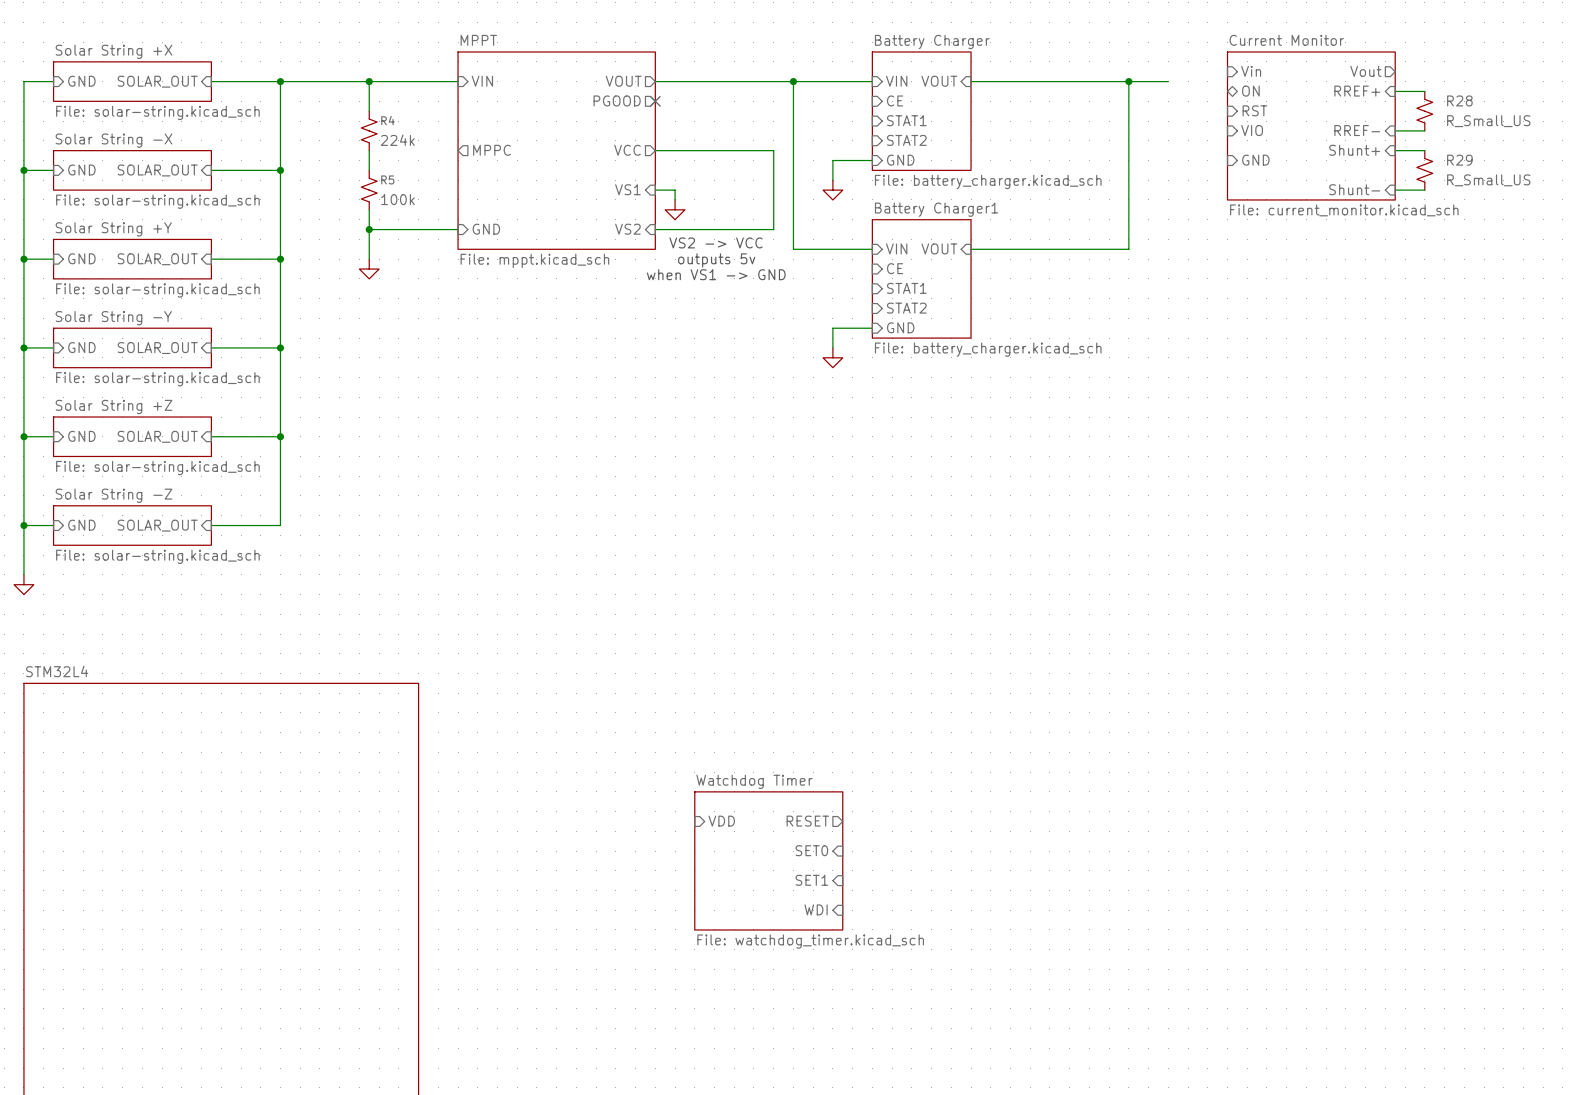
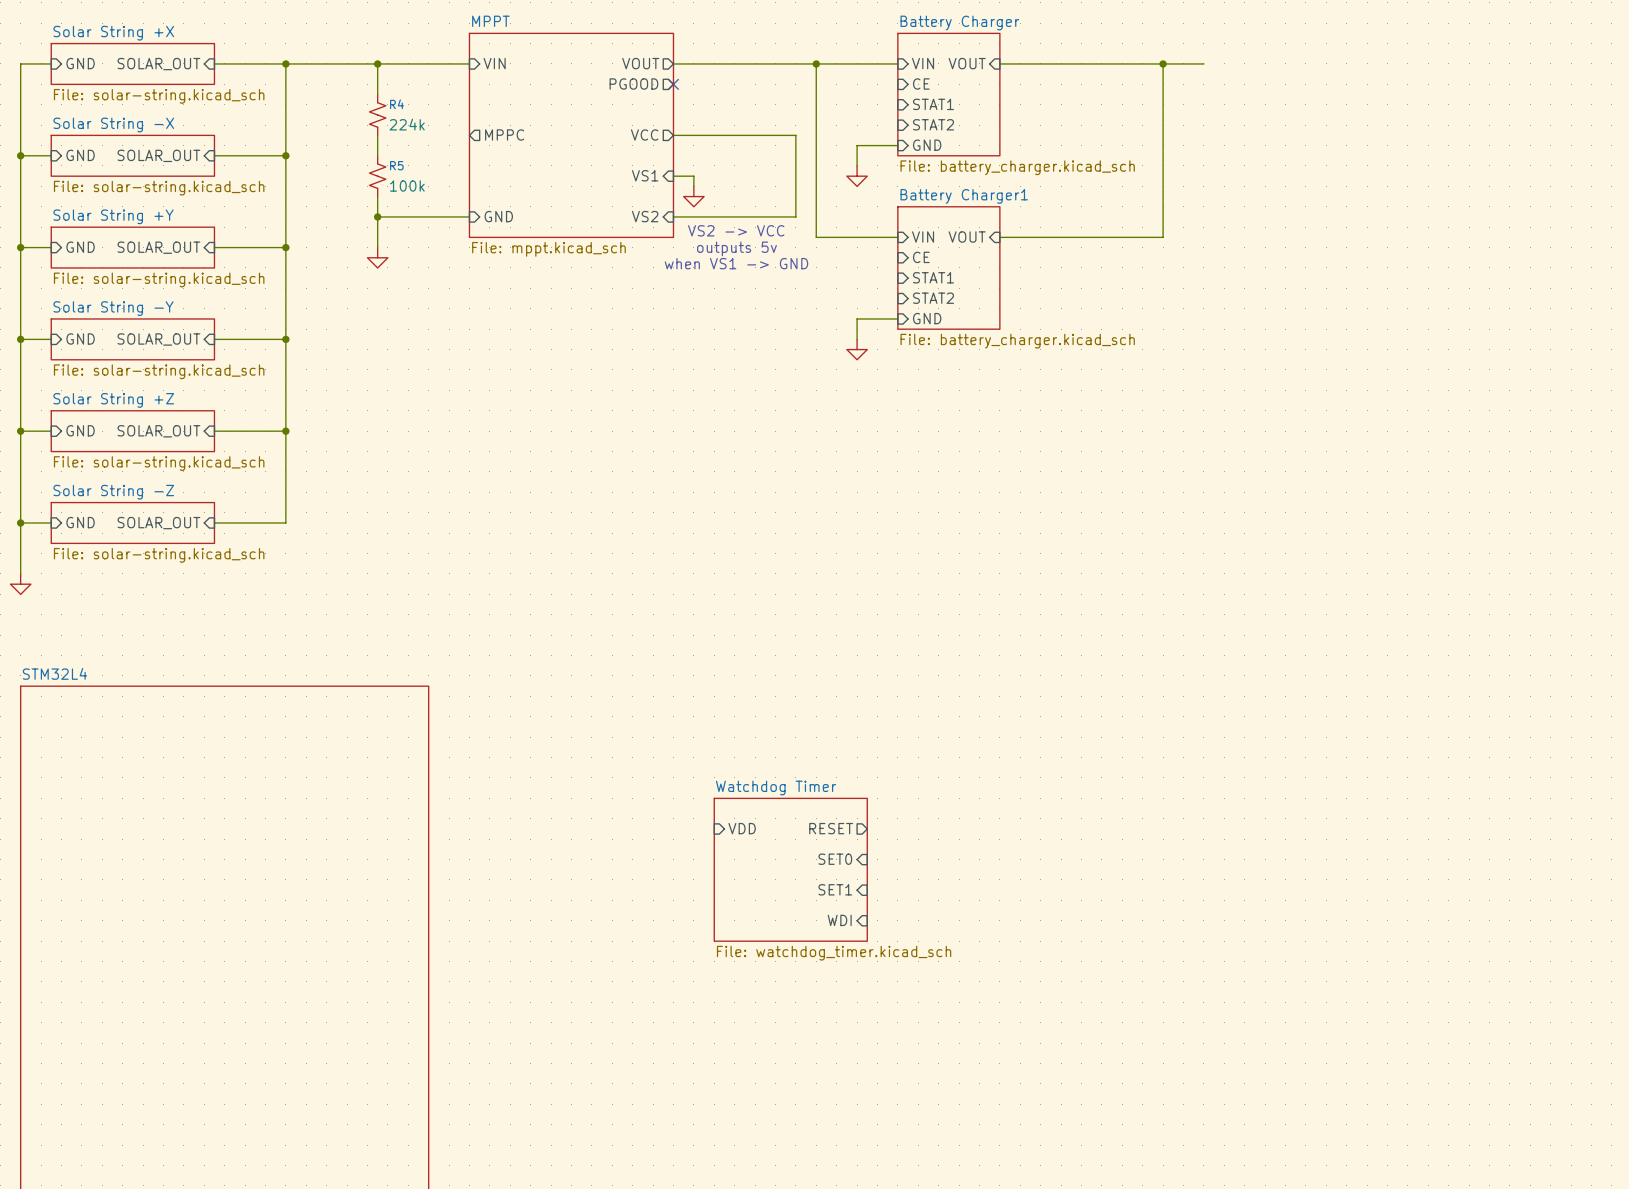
sheet pin: Vin (1251, 71) -> none
sheet pin: Vout (1365, 71) -> none
sheet pin: ON (1250, 91) -> none
sheet pin: RREF+ (1357, 91) -> none
wire: (1395, 91) (1424, 91) -> none
sheet pin: RST (1254, 110) -> none
R28: R_Small_US (1424, 111) -> none
sheet Current Monitor: File: current_monitor.kicad_sch (1311, 125) -> none
sheet pin: VIO (1252, 130) -> none
sheet pin: RREF- (1357, 130) -> none
wire: (1395, 130) (1424, 130) -> none
sheet pin: Shunt+ (1354, 150) -> none
wire: (1395, 150) (1424, 150) -> none
sheet pin: GND (1255, 160) -> none
R29: R_Small_US (1424, 170) -> none
sheet pin: Shunt- (1354, 189) -> none
wire: (1395, 190) (1424, 190) -> none

